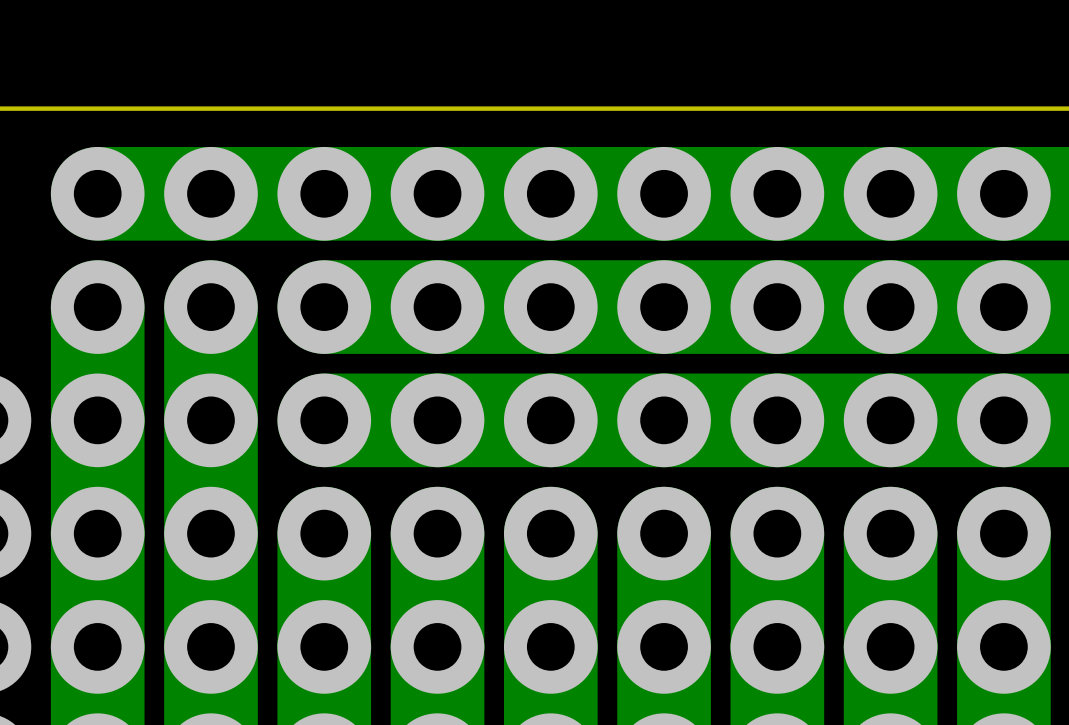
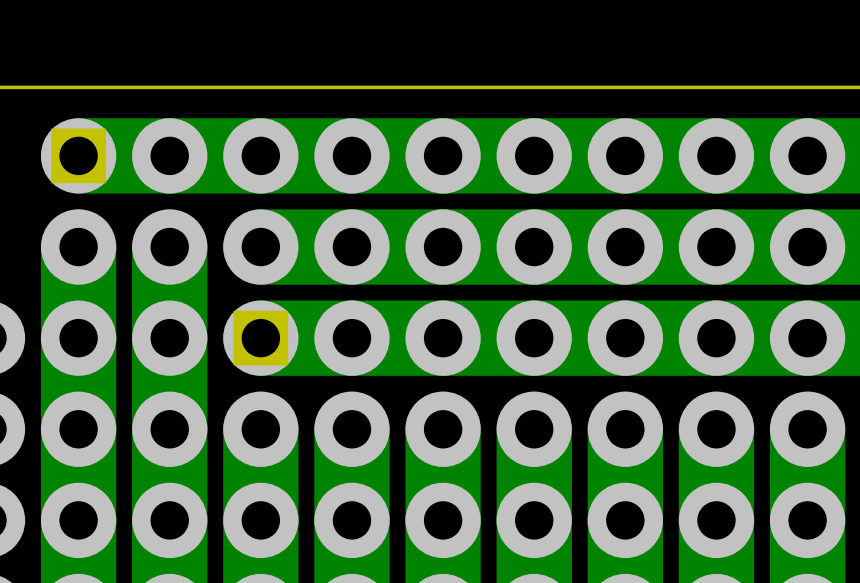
part: none -> (78, 155)
part: none -> (260, 338)

